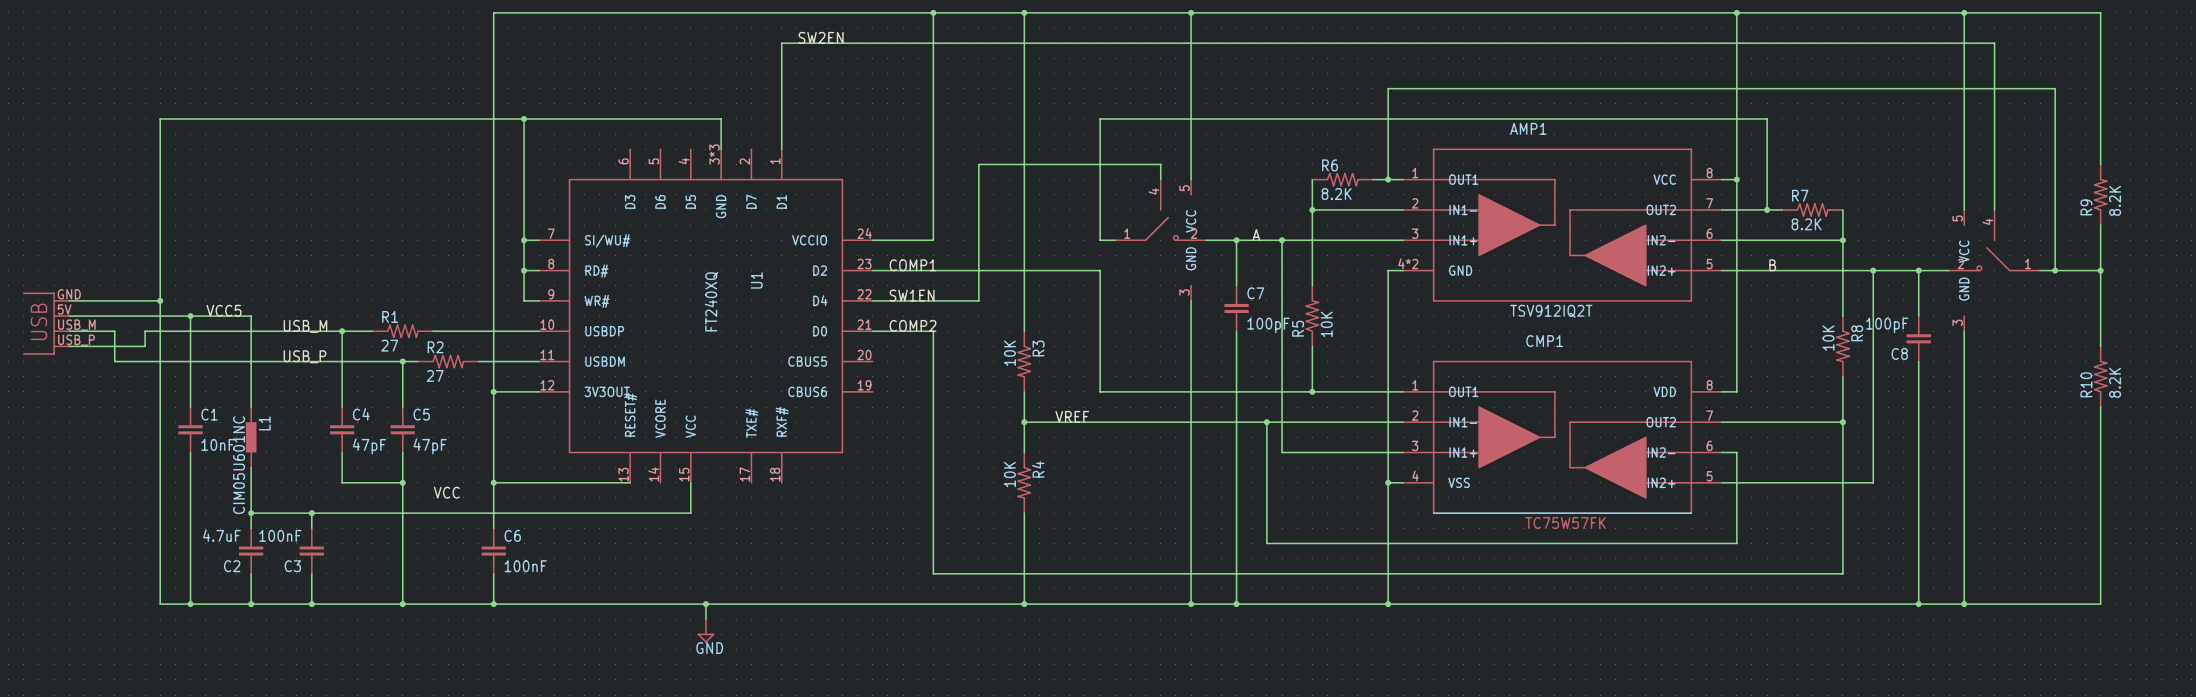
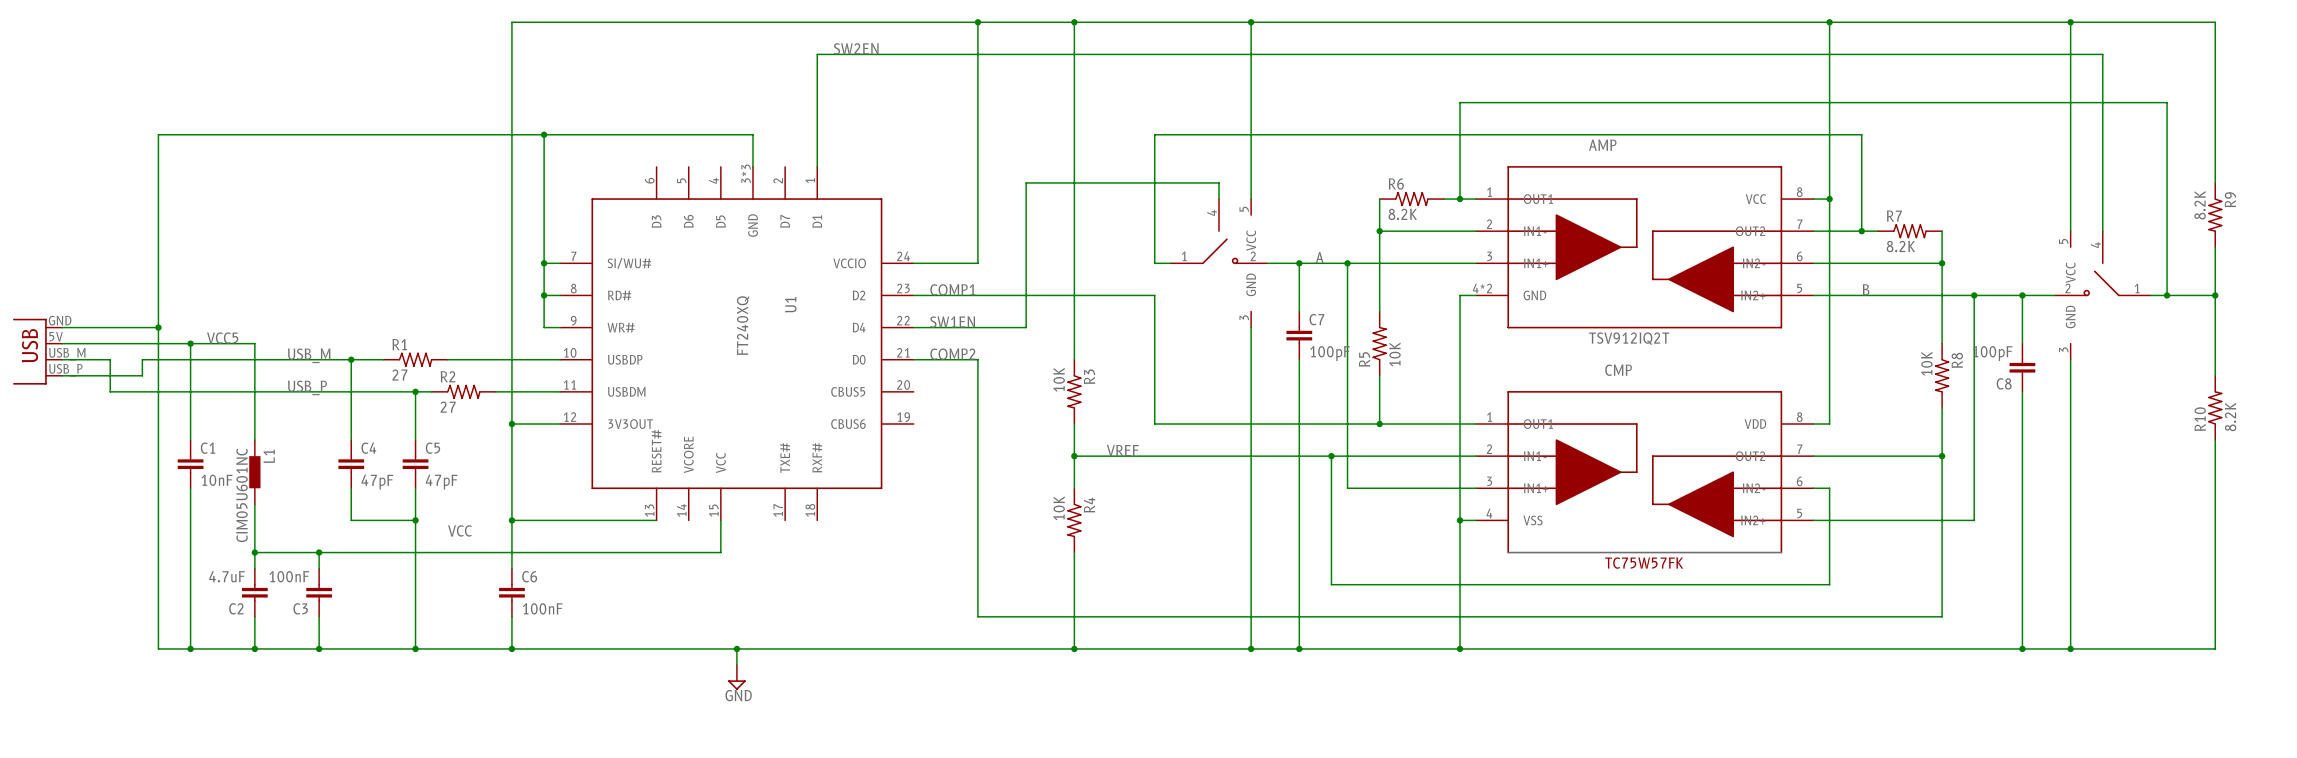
AMP1 name: AMP1 (1528, 128) -> AMP (1602, 145)
R9 rotation: 0° (2100, 194) -> 180° (2215, 215)
CMP1 name: CMP1 (1544, 341) -> CMP (1618, 370)

